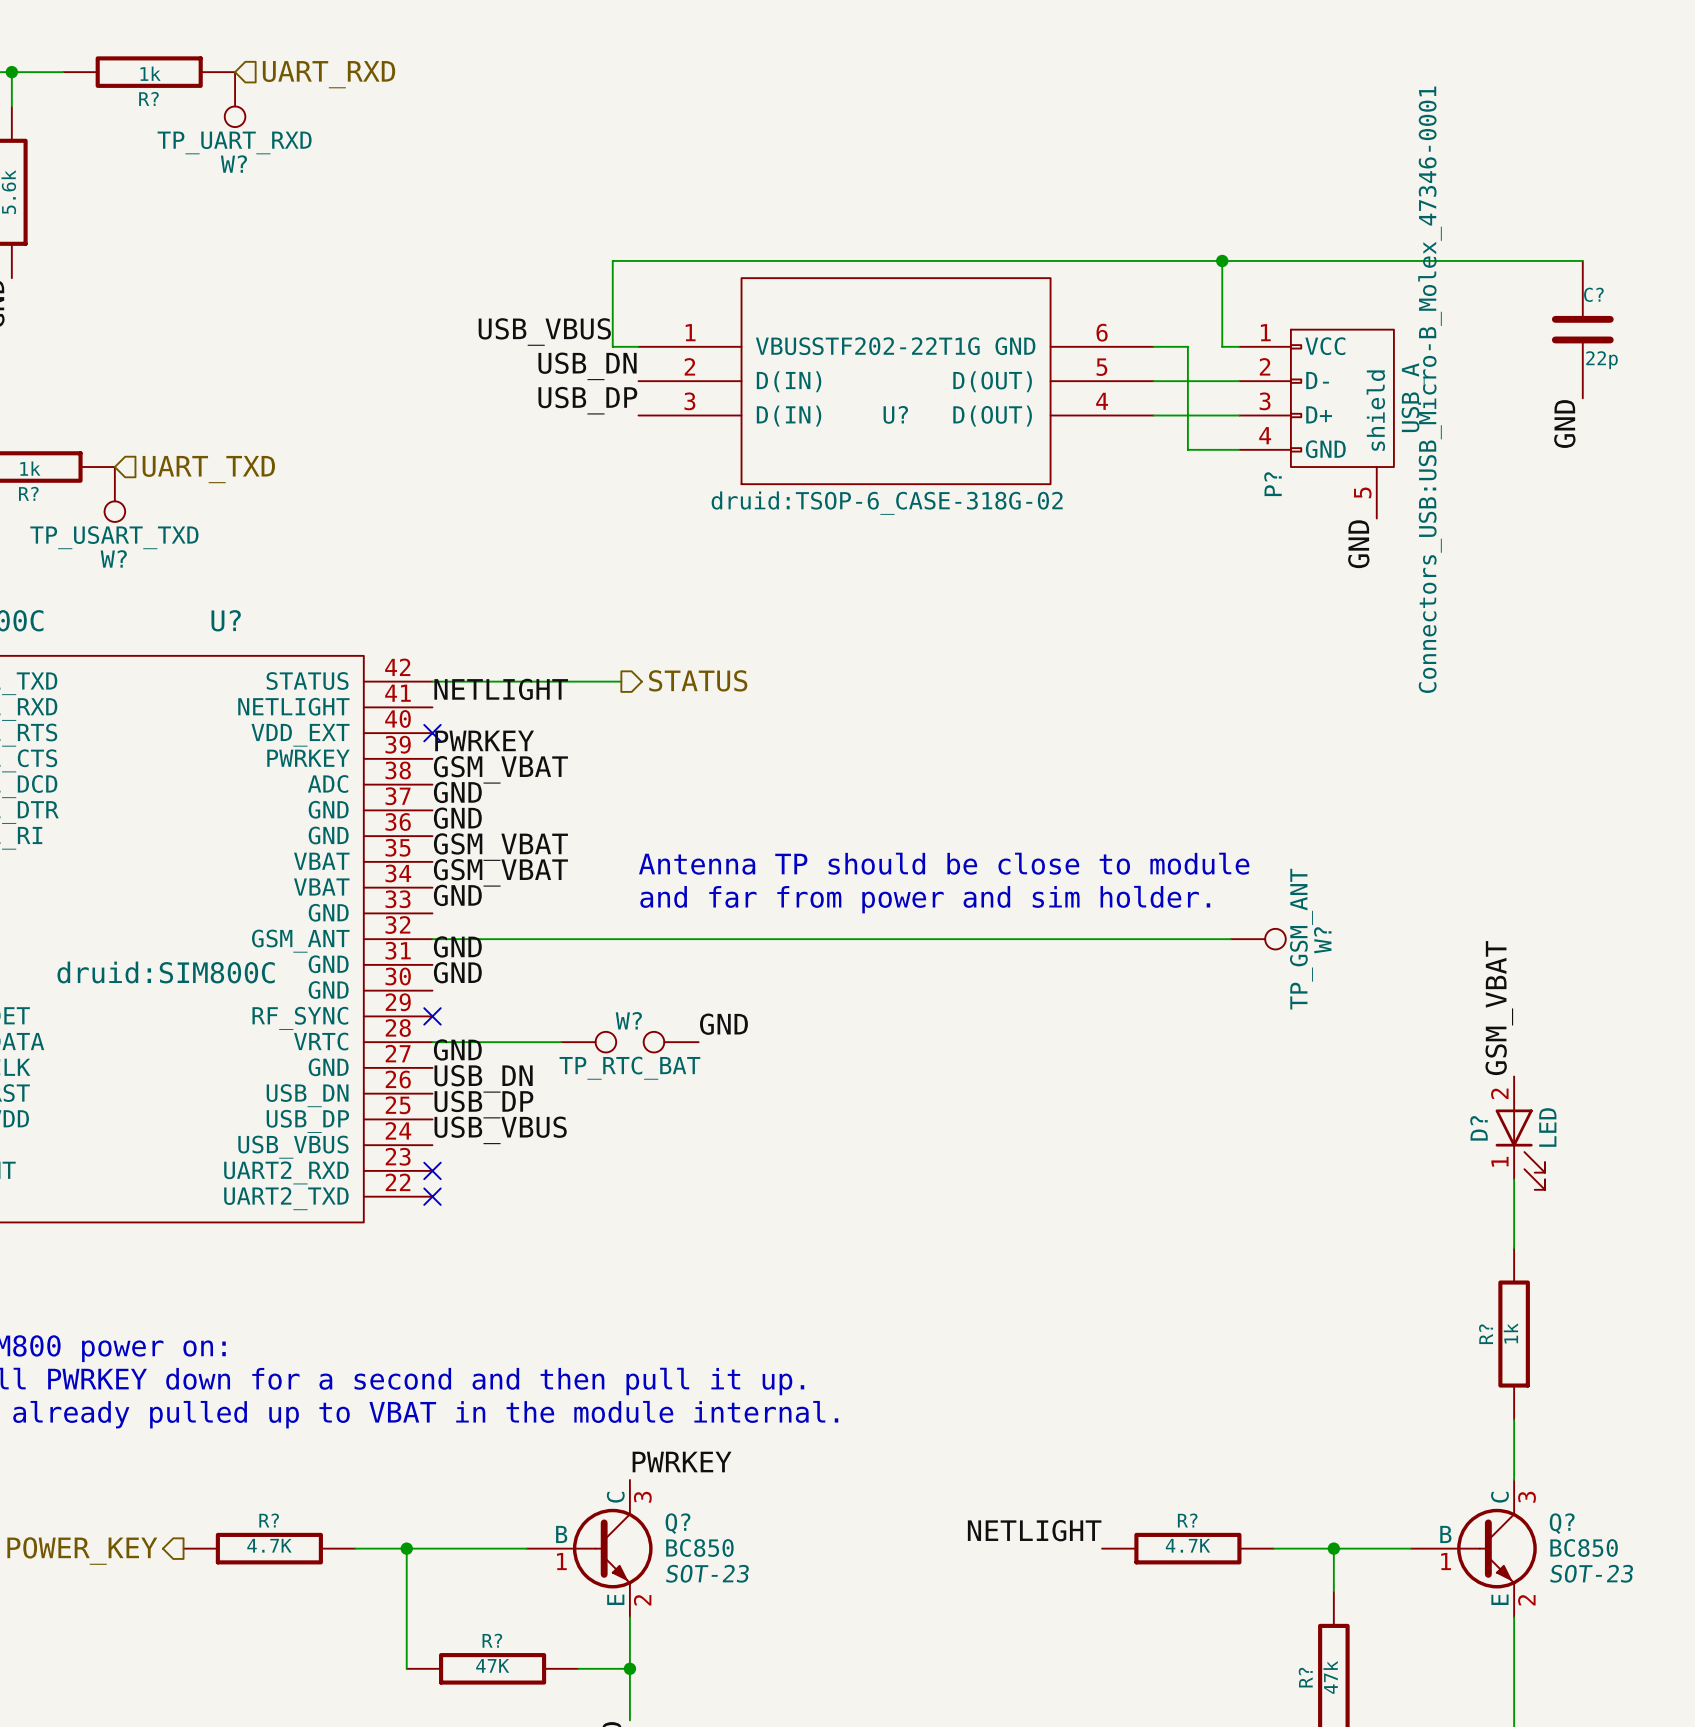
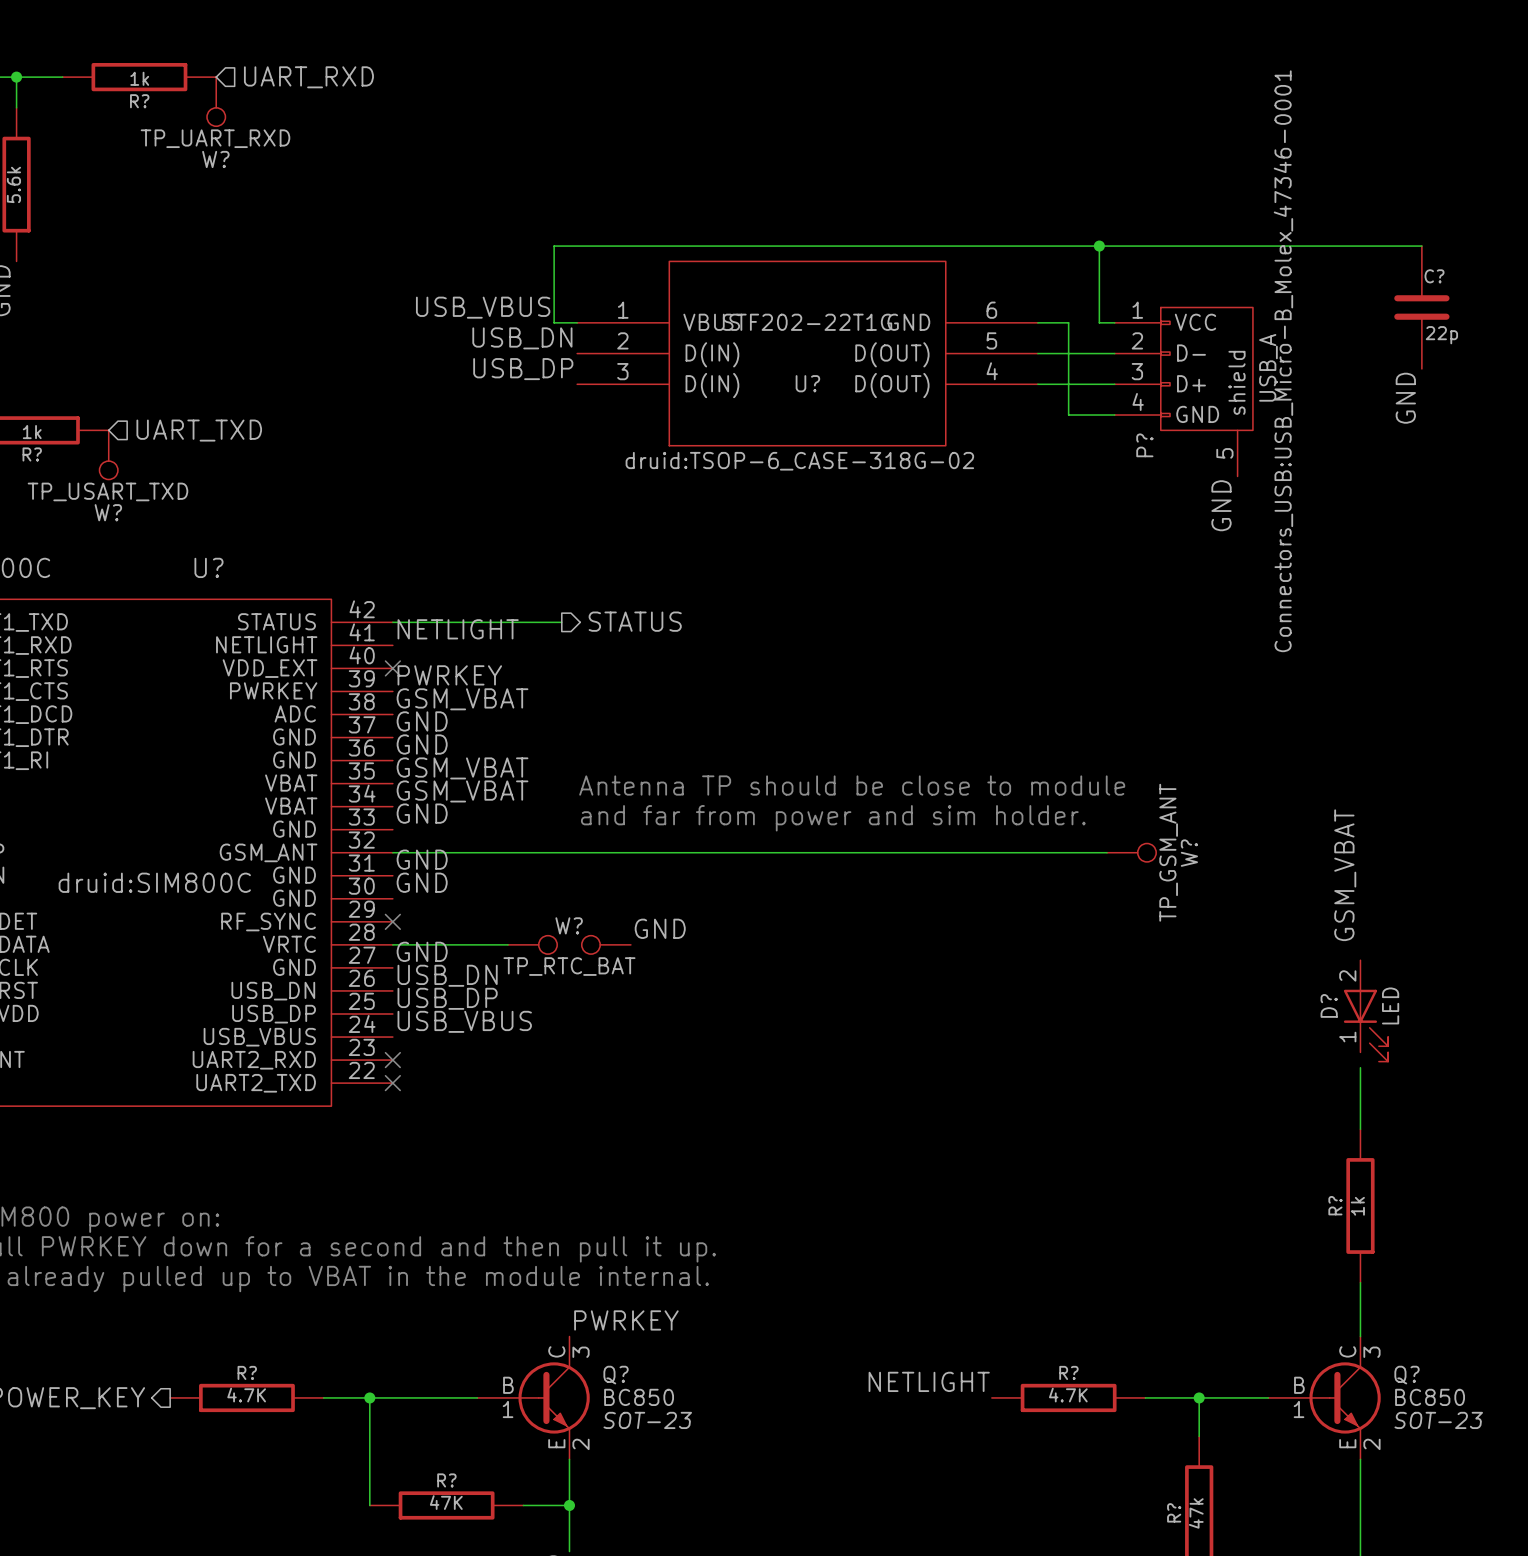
label position: GSM_VBAT (1499, 1008) -> GSM_VBAT (1345, 875)
D? position: (1520, 1133) -> (1365, 1010)

